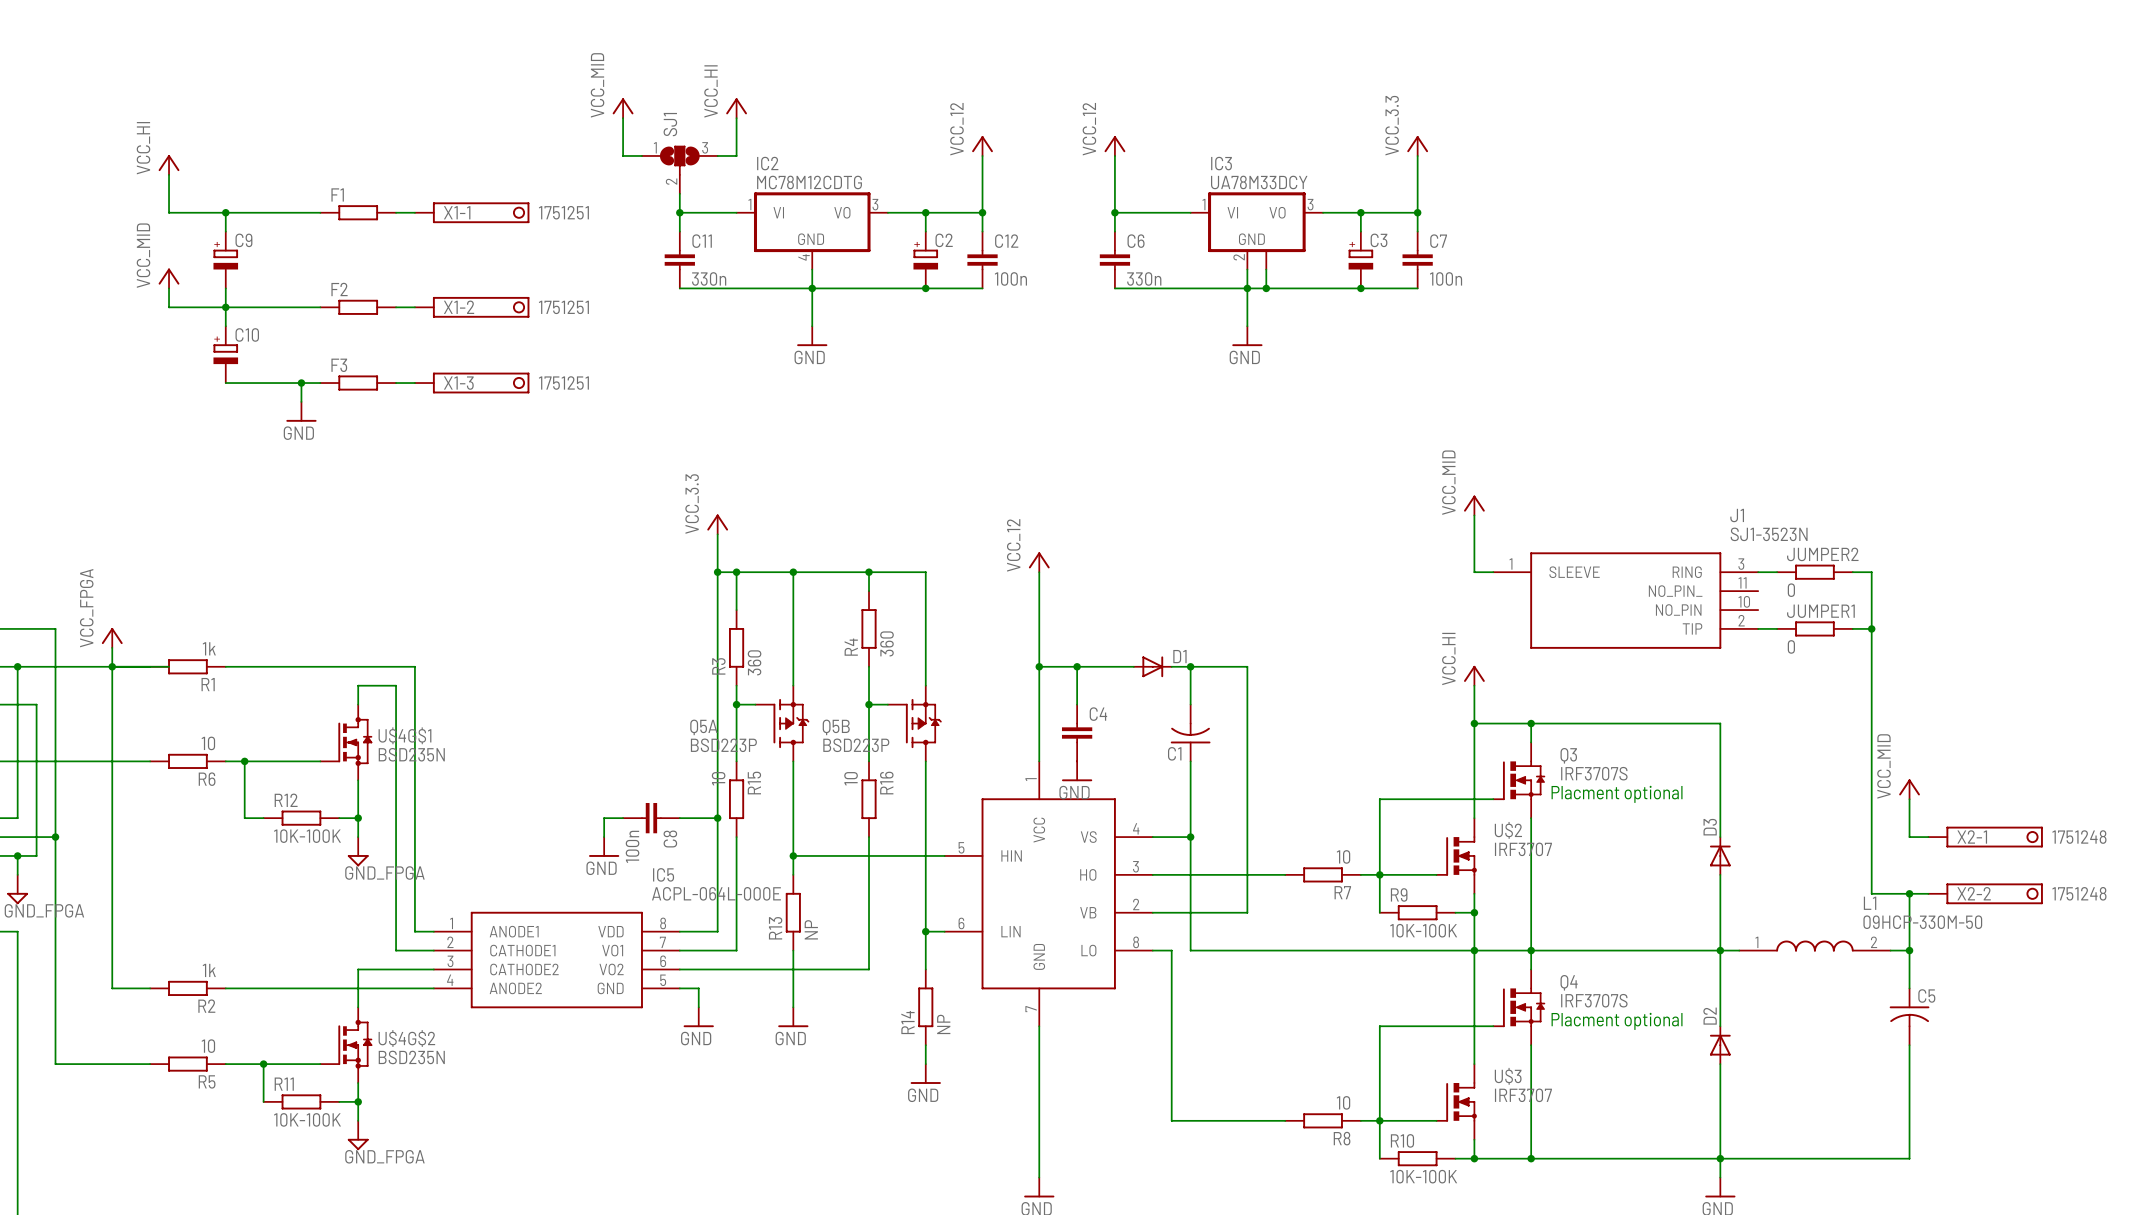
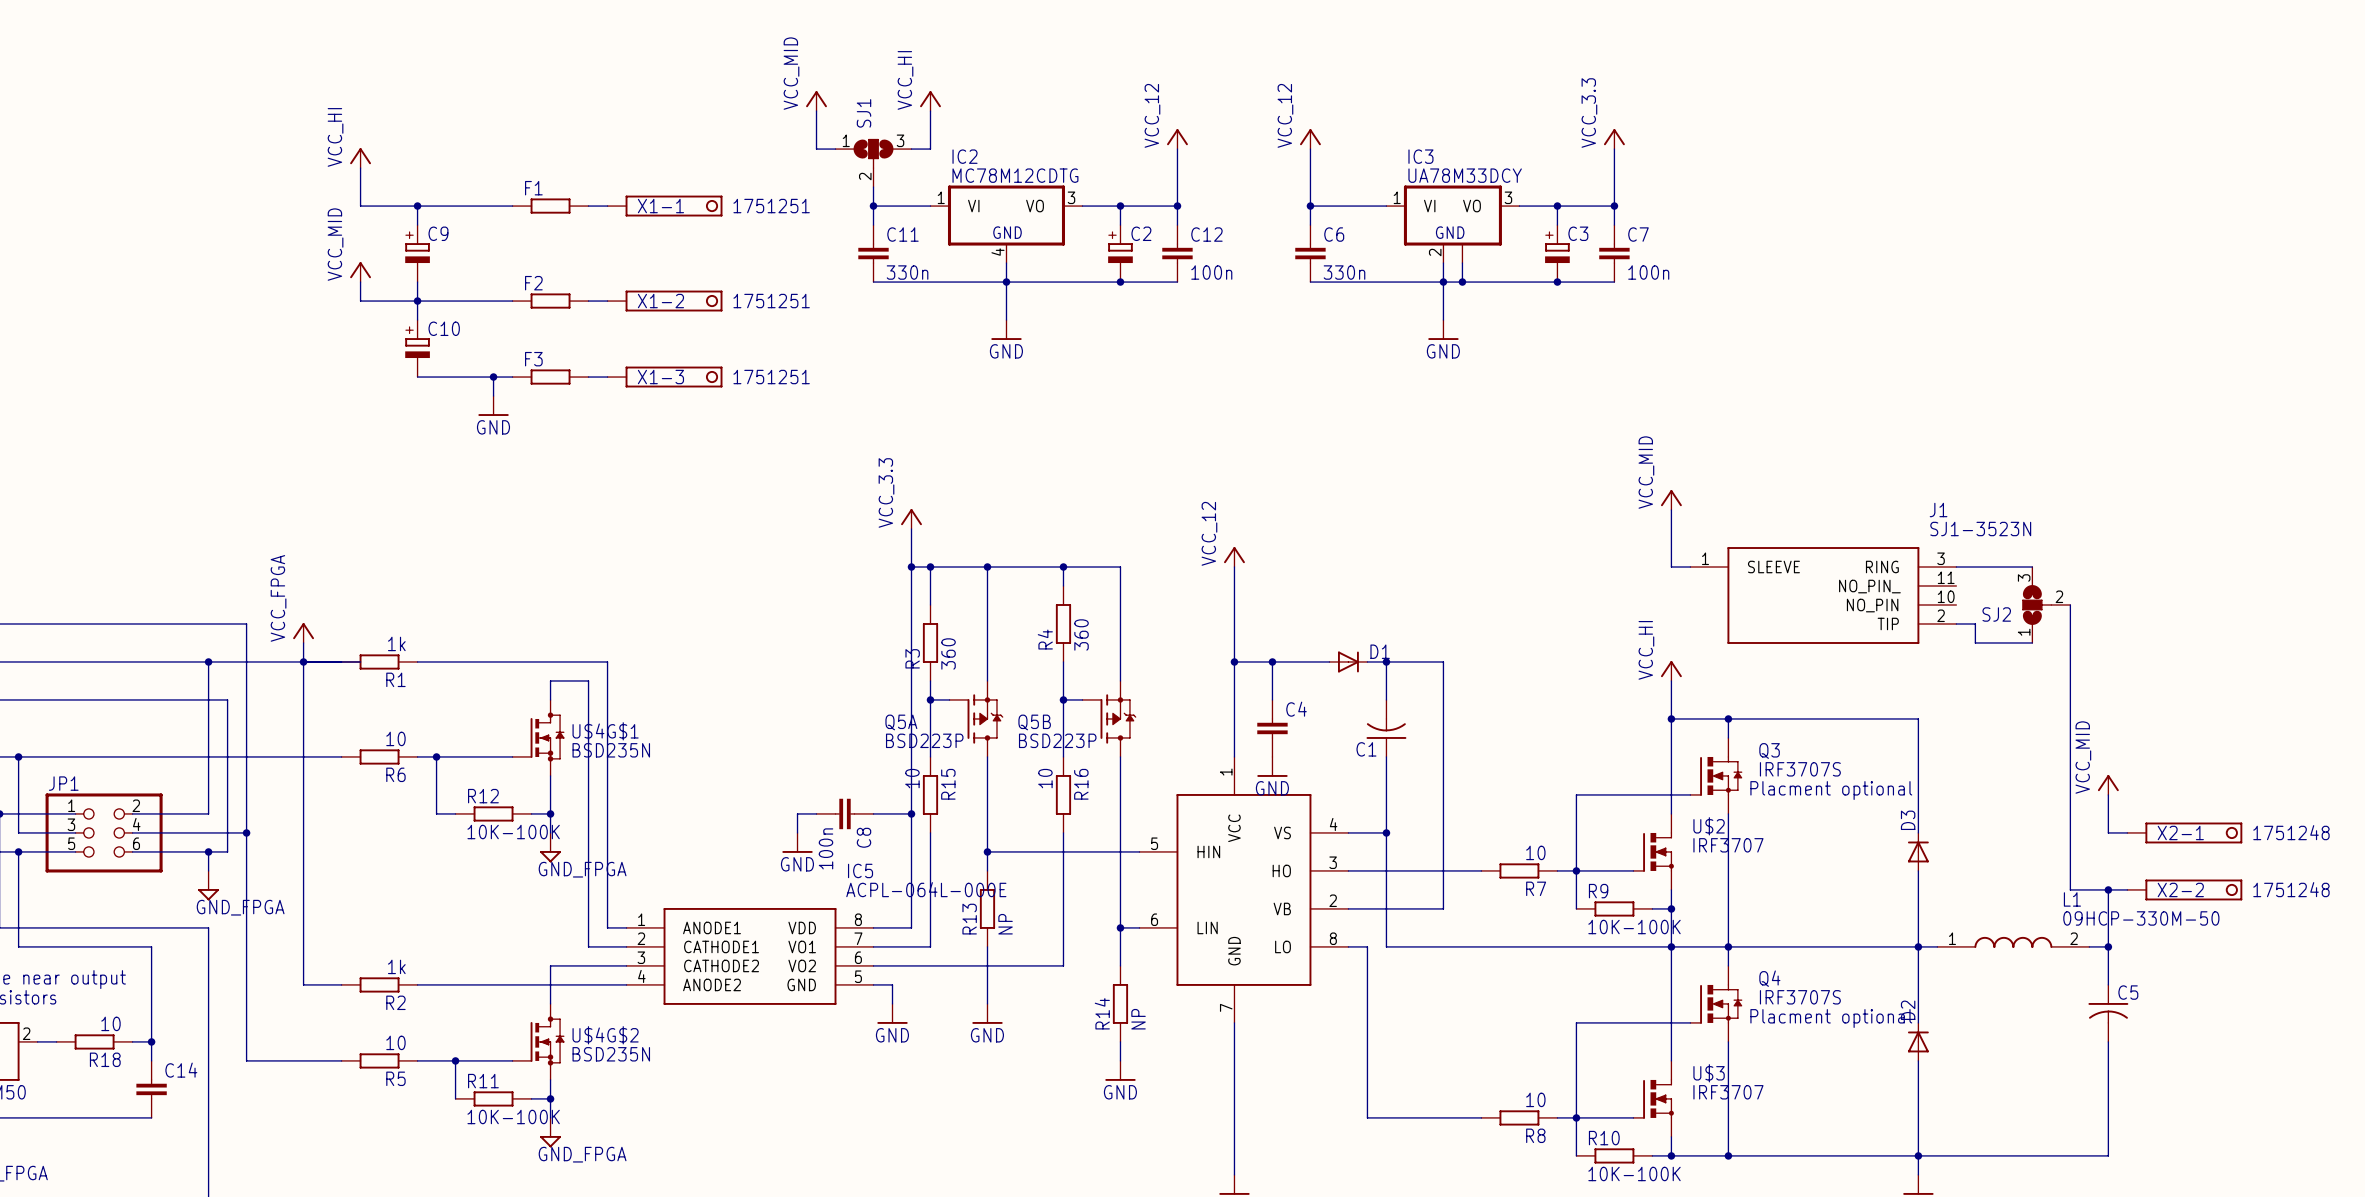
wire: none -> (1975, 567) (2032, 567)
JUMPER2: 0 (1814, 572) -> none
wire: (1852, 572) (1871, 572) (1871, 610) -> none
SJ2: none -> (2046, 604)
wire: none -> (1975, 623) (1975, 642) (2032, 642)
JUMPER1: 0 (1814, 628) -> none
wire: (1852, 628) (1871, 628) -> none
junction: (1871, 628) -> none

